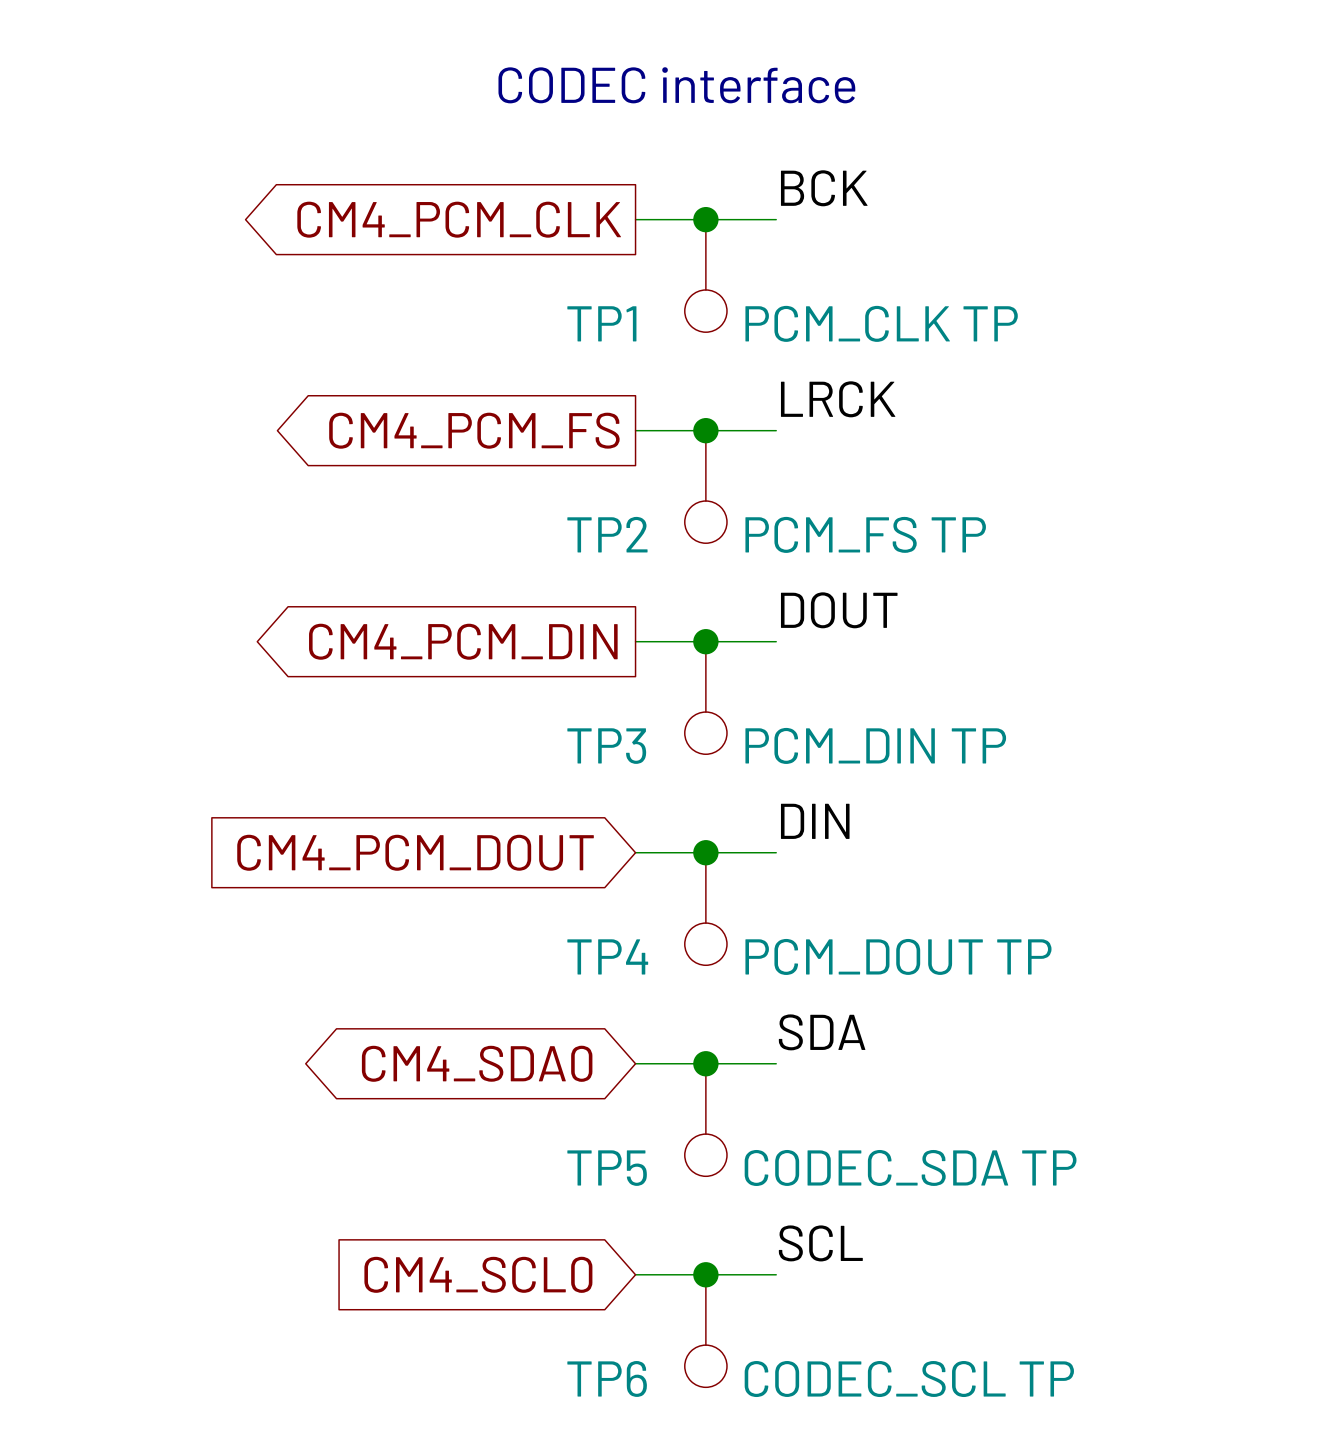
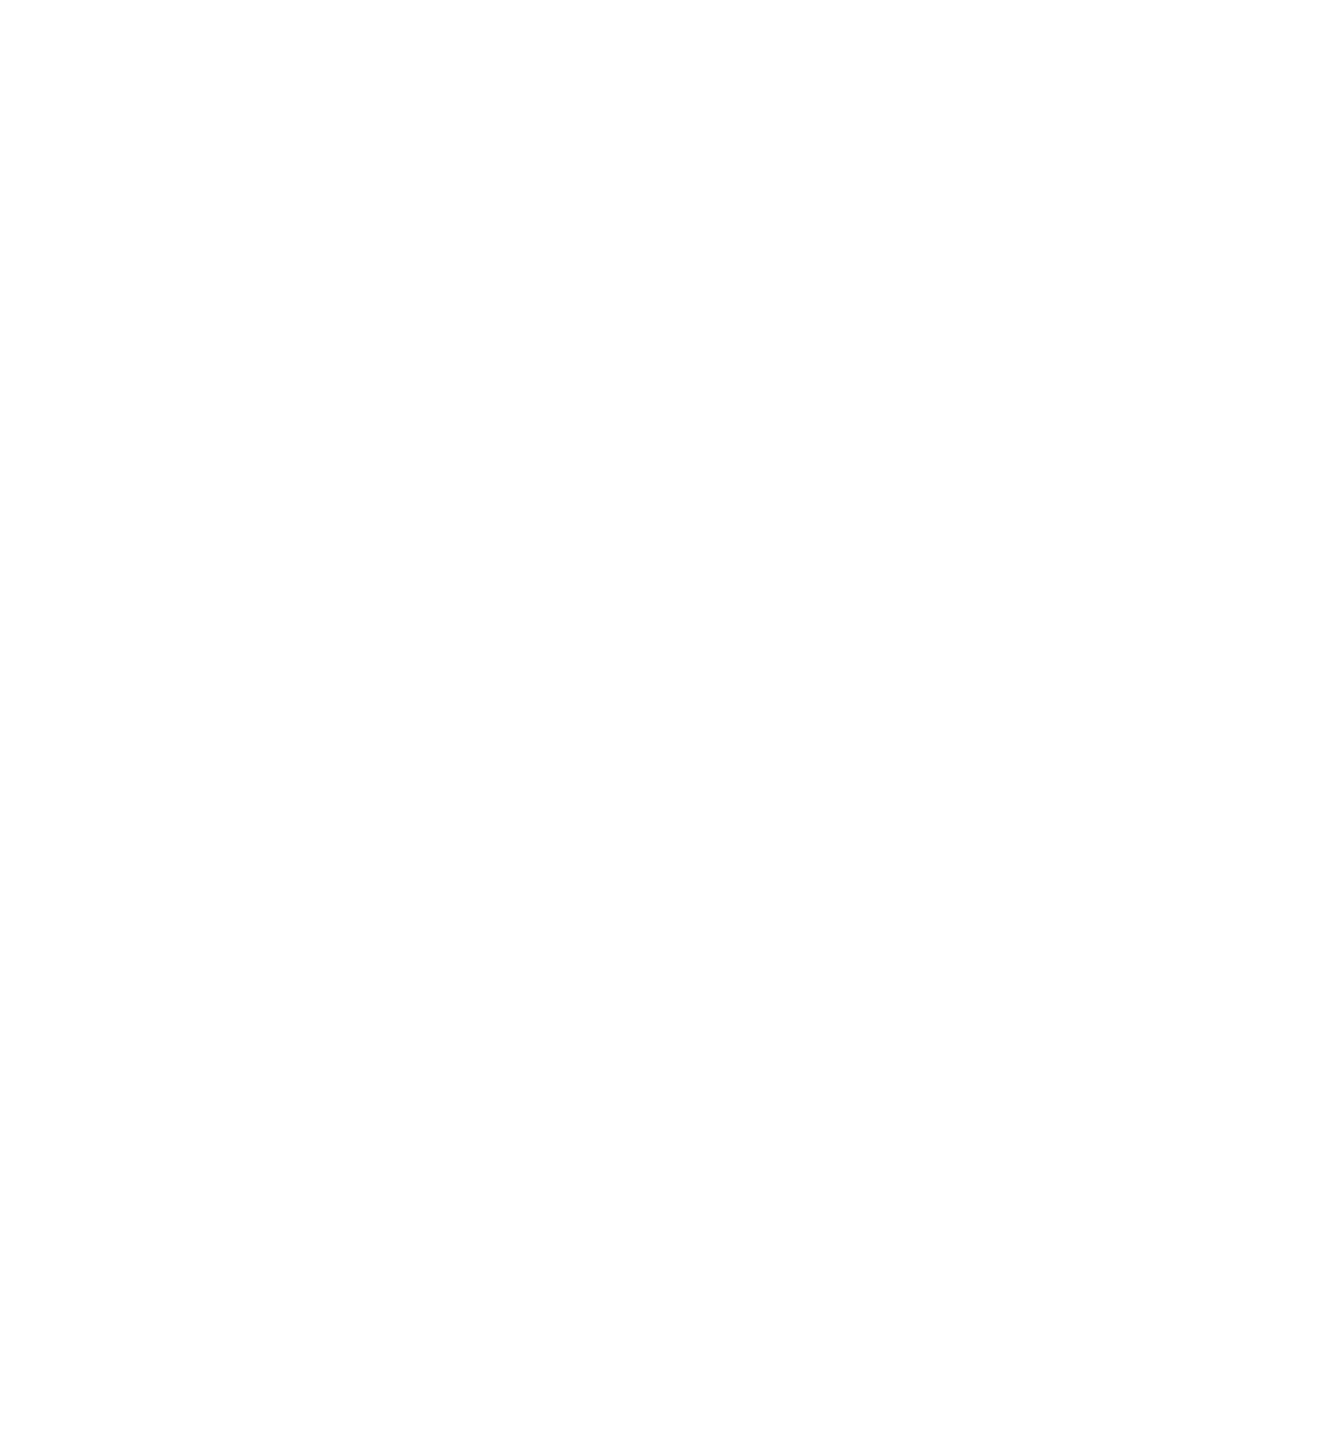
text: CODEC interface (676, 85) -> none
label: BCK (824, 188) -> none
global label: CM4_PCM_CLK (459, 219) -> none
wire: (635, 219) (776, 219) -> none
junction: (705, 219) -> none
TP1: PCM_CLK TP (705, 275) -> none
label: LRCK (838, 399) -> none
global label: CM4_PCM_FS (474, 430) -> none
wire: (635, 430) (776, 430) -> none
junction: (705, 430) -> none
TP2: PCM_FS TP (705, 486) -> none
label: DOUT (839, 610) -> none
global label: CM4_PCM_DIN (463, 641) -> none
wire: (635, 641) (776, 641) -> none
junction: (705, 641) -> none
TP3: PCM_DIN TP (705, 697) -> none
label: DIN (815, 821) -> none
global label: CM4_PCM_DOUT (415, 852) -> none
wire: (635, 852) (776, 852) -> none
junction: (705, 852) -> none
TP4: PCM_DOUT TP (705, 909) -> none
label: SDA (822, 1032) -> none
global label: CM4_SDA0 (477, 1063) -> none
wire: (635, 1063) (776, 1063) -> none
junction: (705, 1063) -> none
TP5: CODEC_SDA TP (705, 1120) -> none
label: SCL (820, 1243) -> none
global label: CM4_SCL0 (478, 1274) -> none
wire: (635, 1274) (776, 1274) -> none
junction: (705, 1274) -> none
TP6: CODEC_SCL TP (705, 1331) -> none

